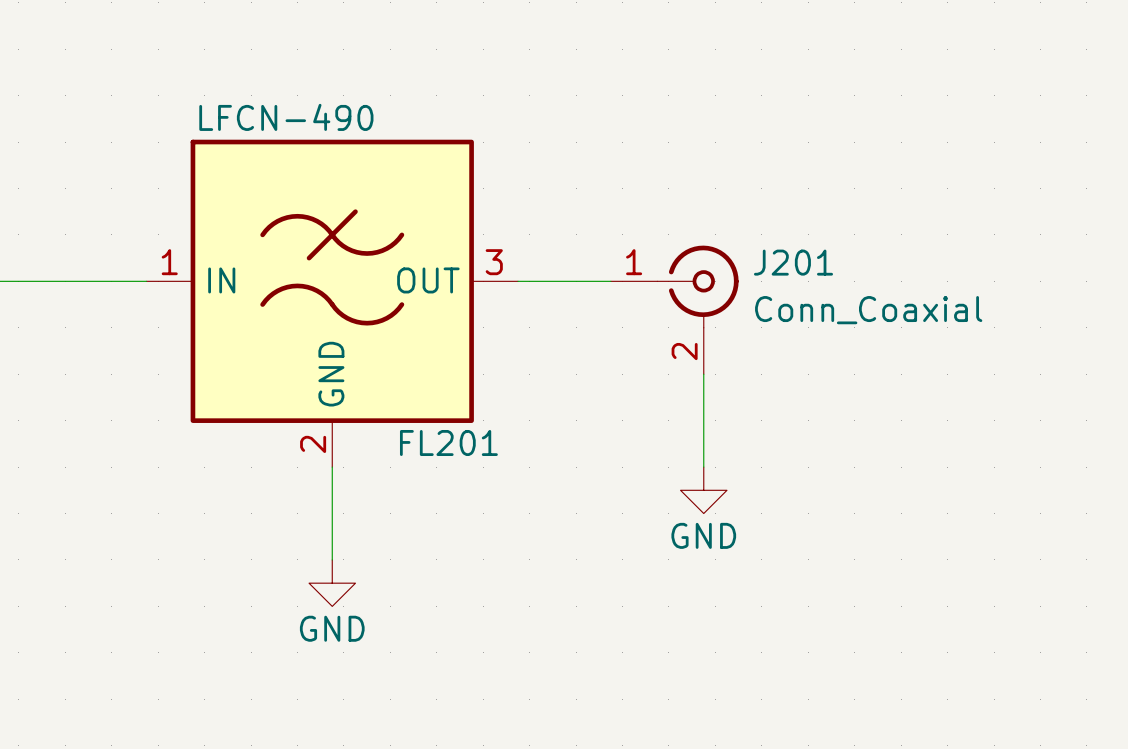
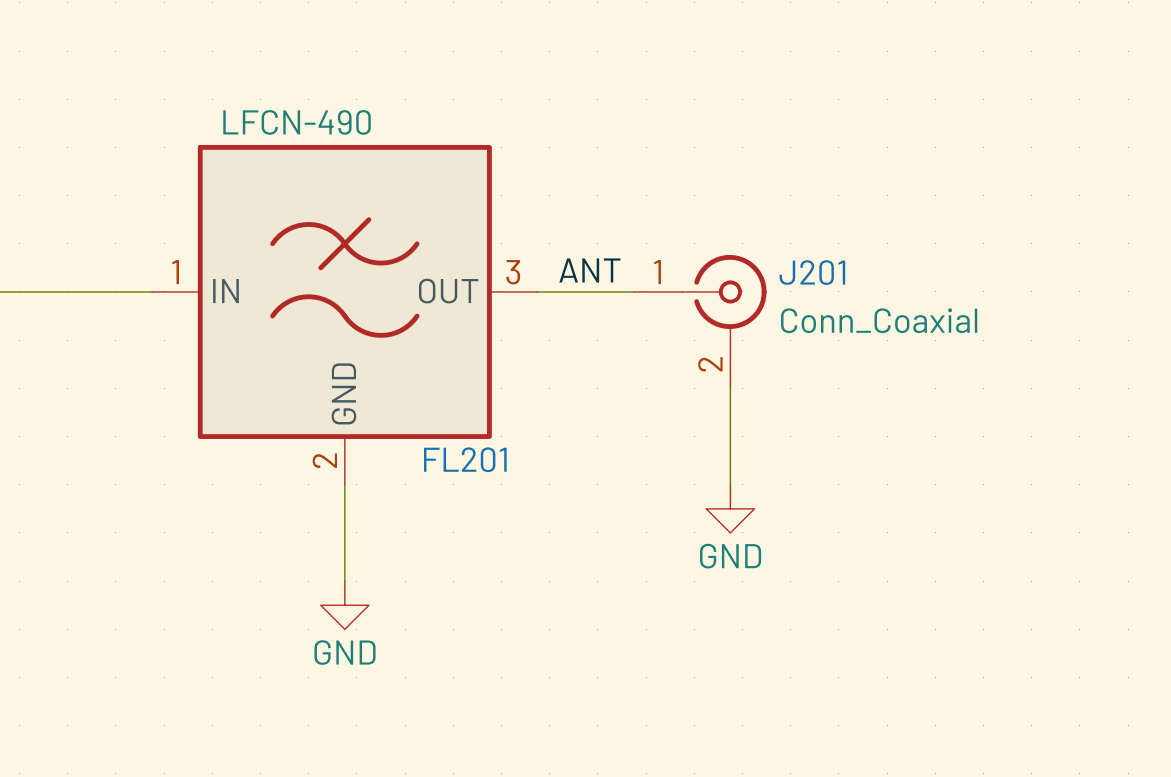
label: none -> ANT (589, 270)

